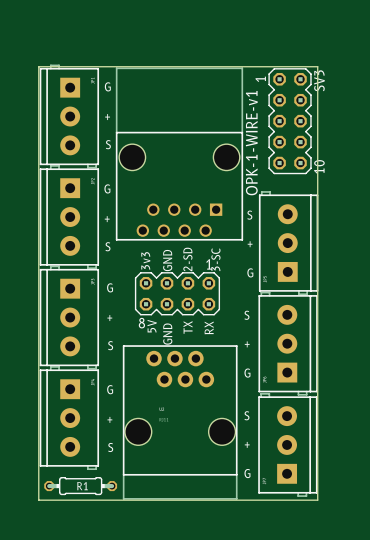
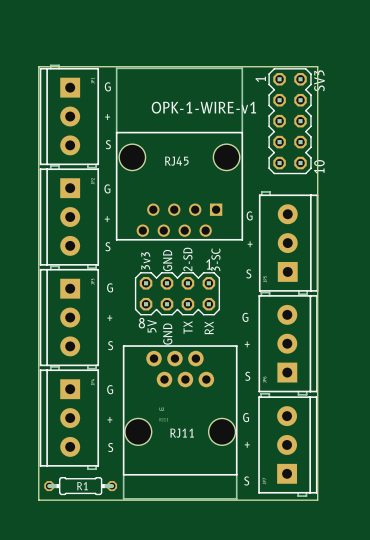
text rotation: 0° (251, 143) -> 90° clockwise (203, 107)
text: none -> RJ45 (176, 161)
text: S (249, 215) -> G (249, 215)
text: G (250, 272) -> S (248, 273)
text: S (246, 315) -> G (245, 317)
text: G (247, 373) -> S (247, 376)
text: S (246, 415) -> G (246, 417)
text: none -> RJ11 (182, 433)
text: G (247, 473) -> S (246, 480)

